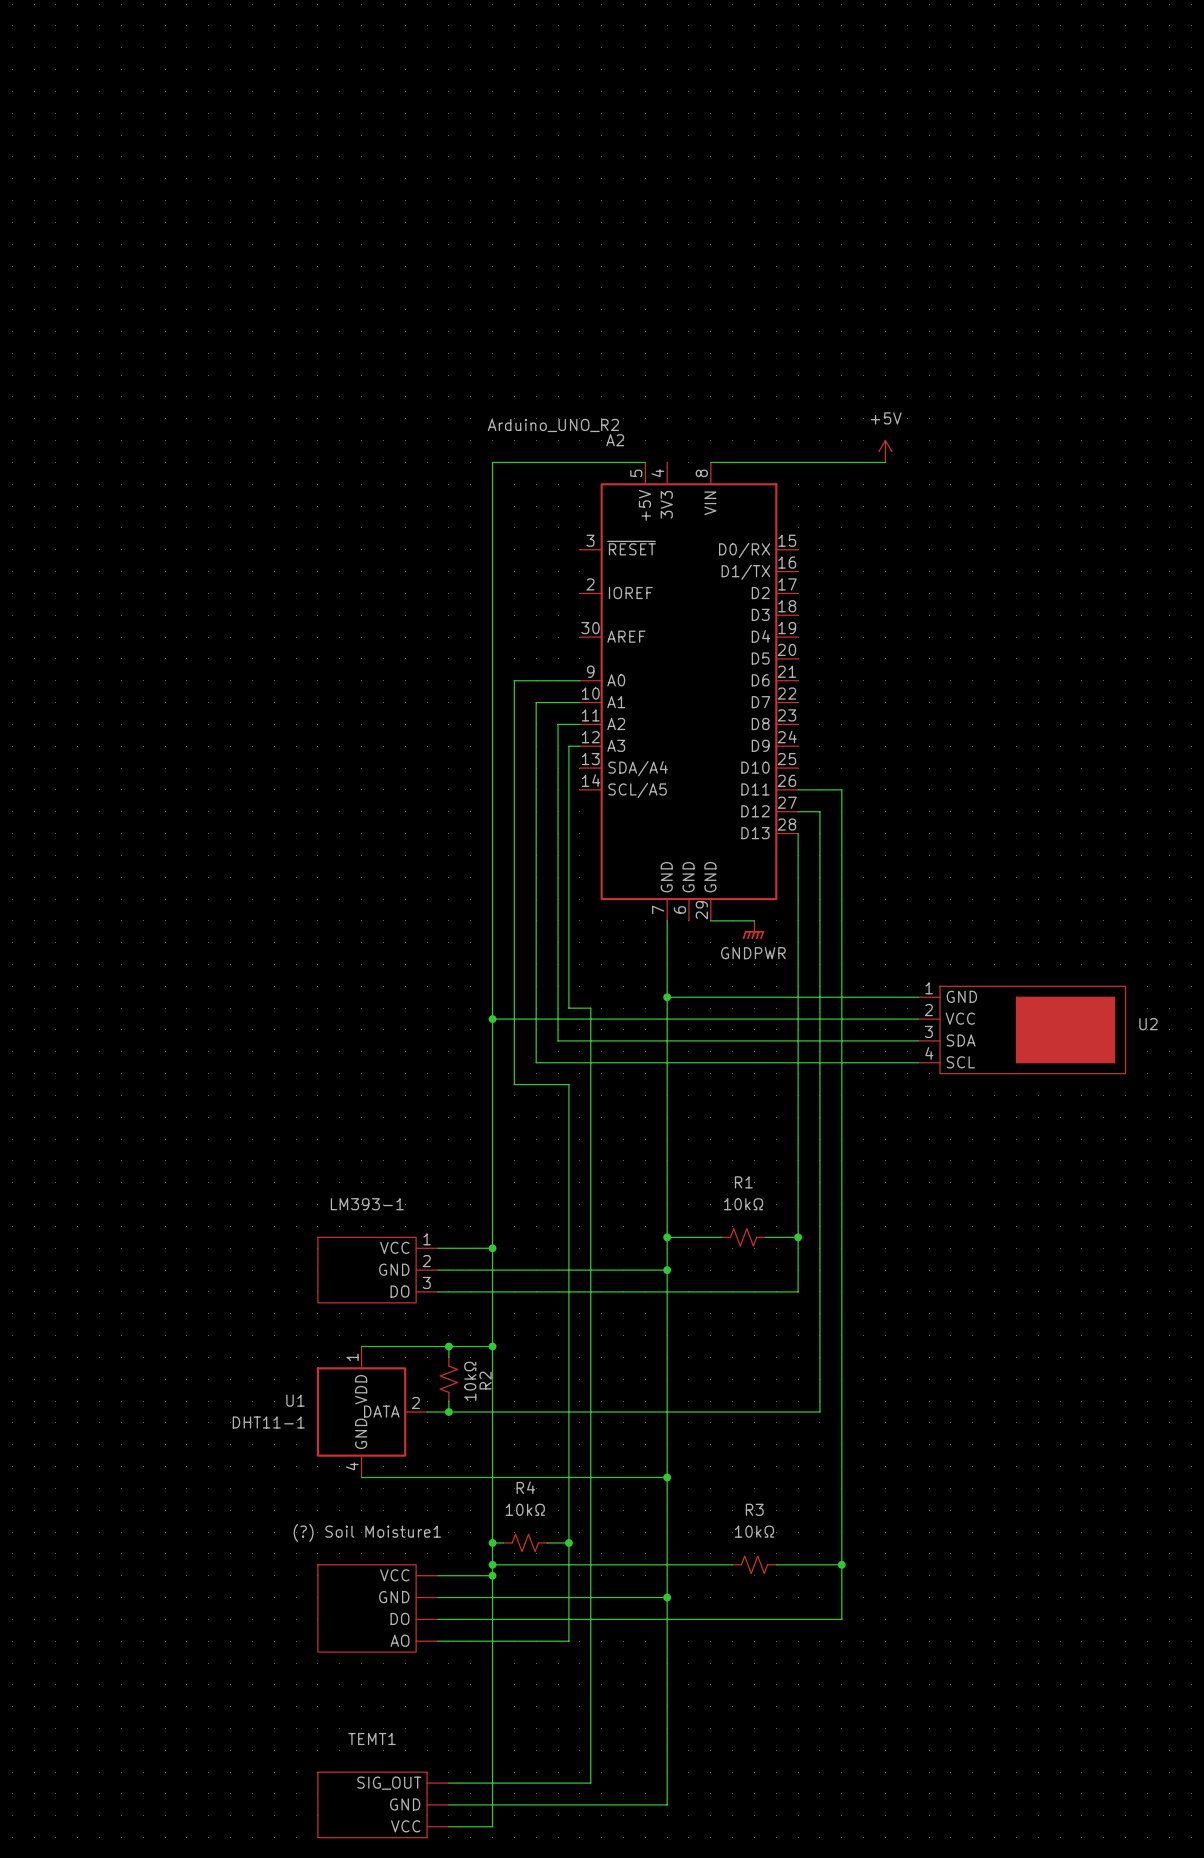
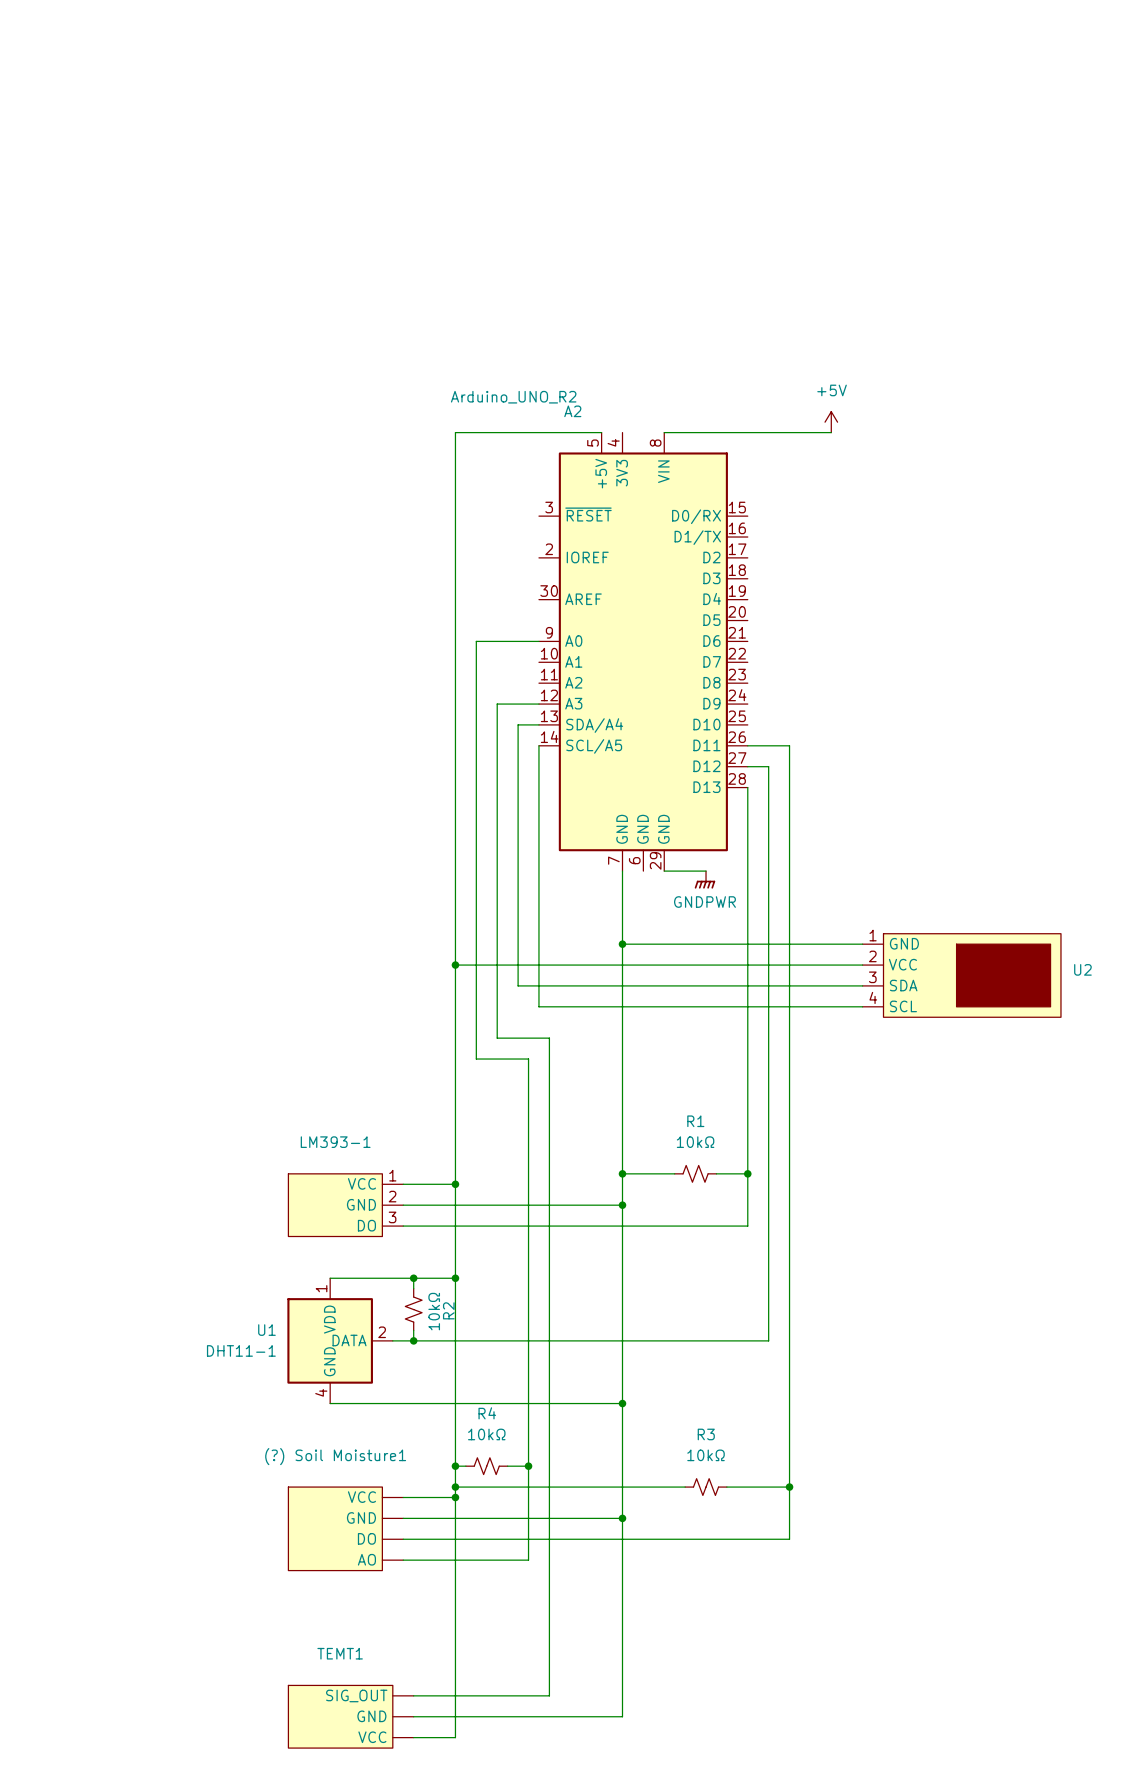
wire: (579, 702) (536, 702) (536, 746) -> (528, 704) (497, 704)
wire: (579, 724) (558, 724) (558, 768) -> (538, 724) (518, 724)
wire: (568, 746) (568, 1008) (590, 1008) (590, 1095) -> none
wire: none -> (538, 745) (538, 1006)
wire: (536, 1062) (579, 1062) -> (497, 1006) (497, 1038) (549, 1038)
wire: (514, 1084) (568, 1084) (568, 1117) -> (476, 1027) (476, 1059) (528, 1059)

